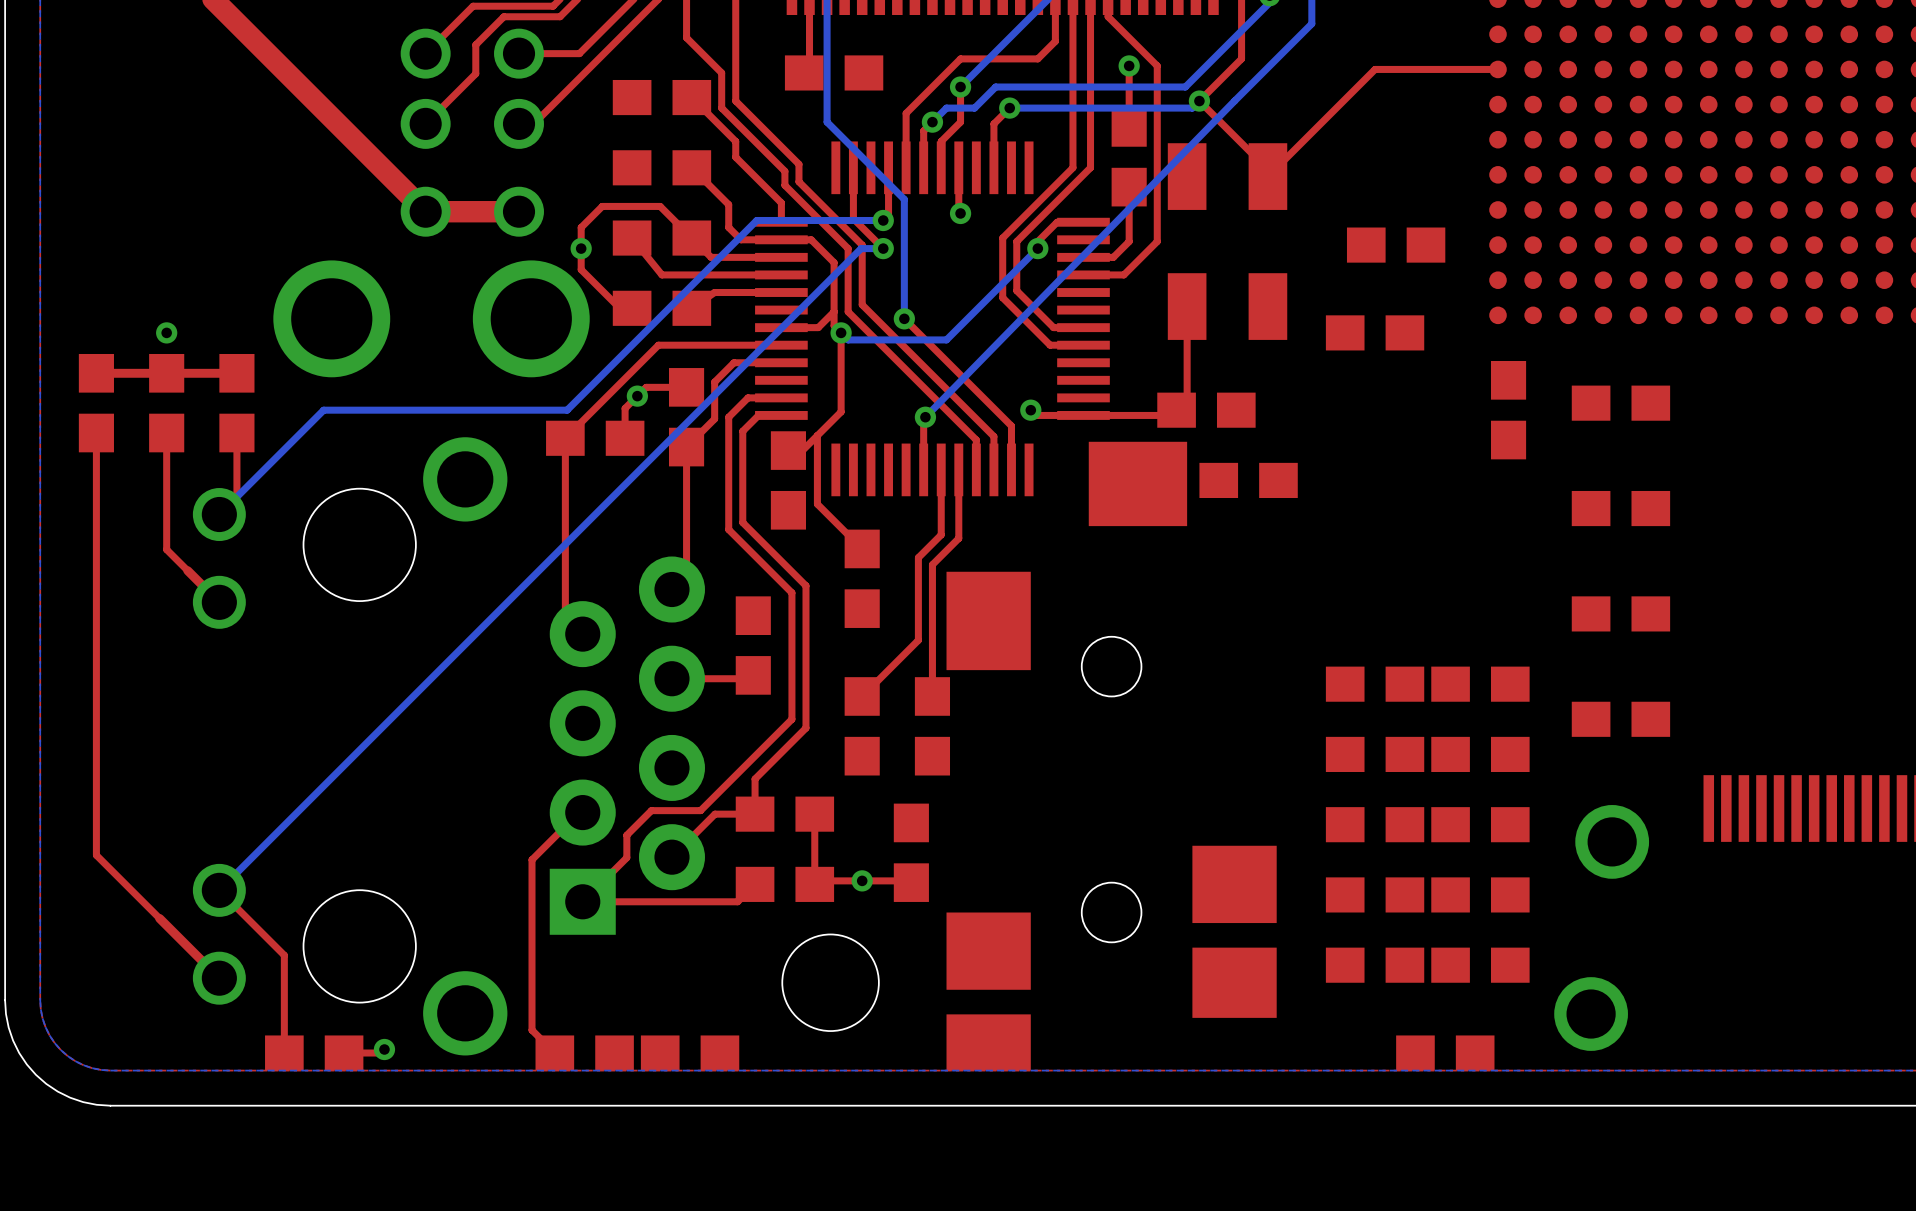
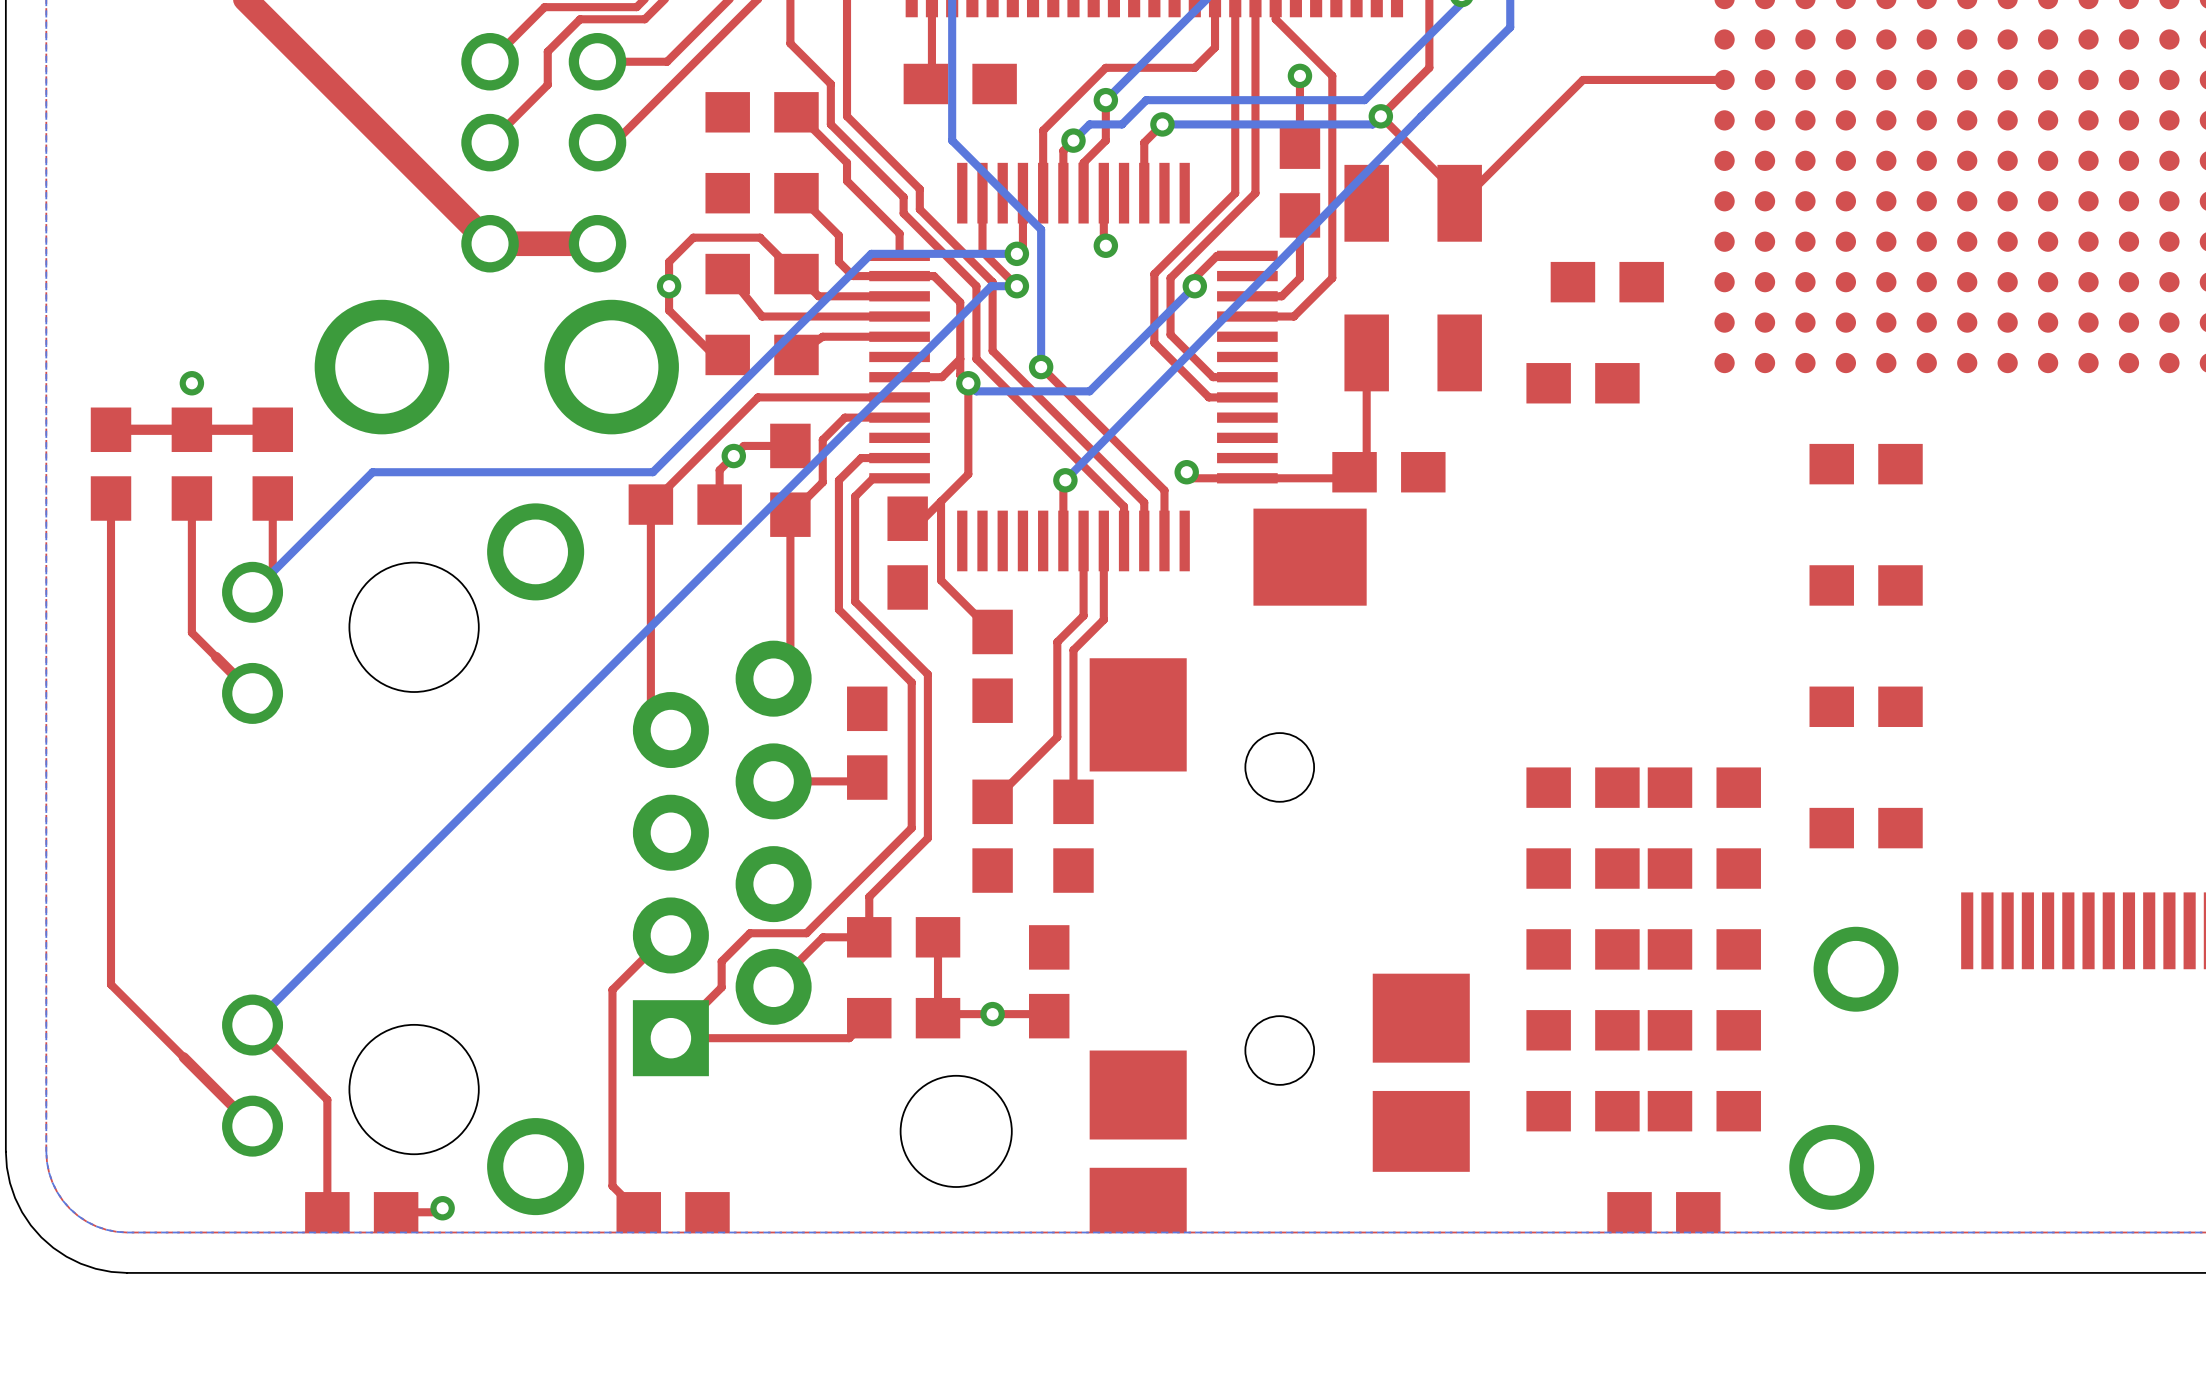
part: (1508, 410) -> none
part: (1248, 480) -> none
part: (690, 1053) -> none

